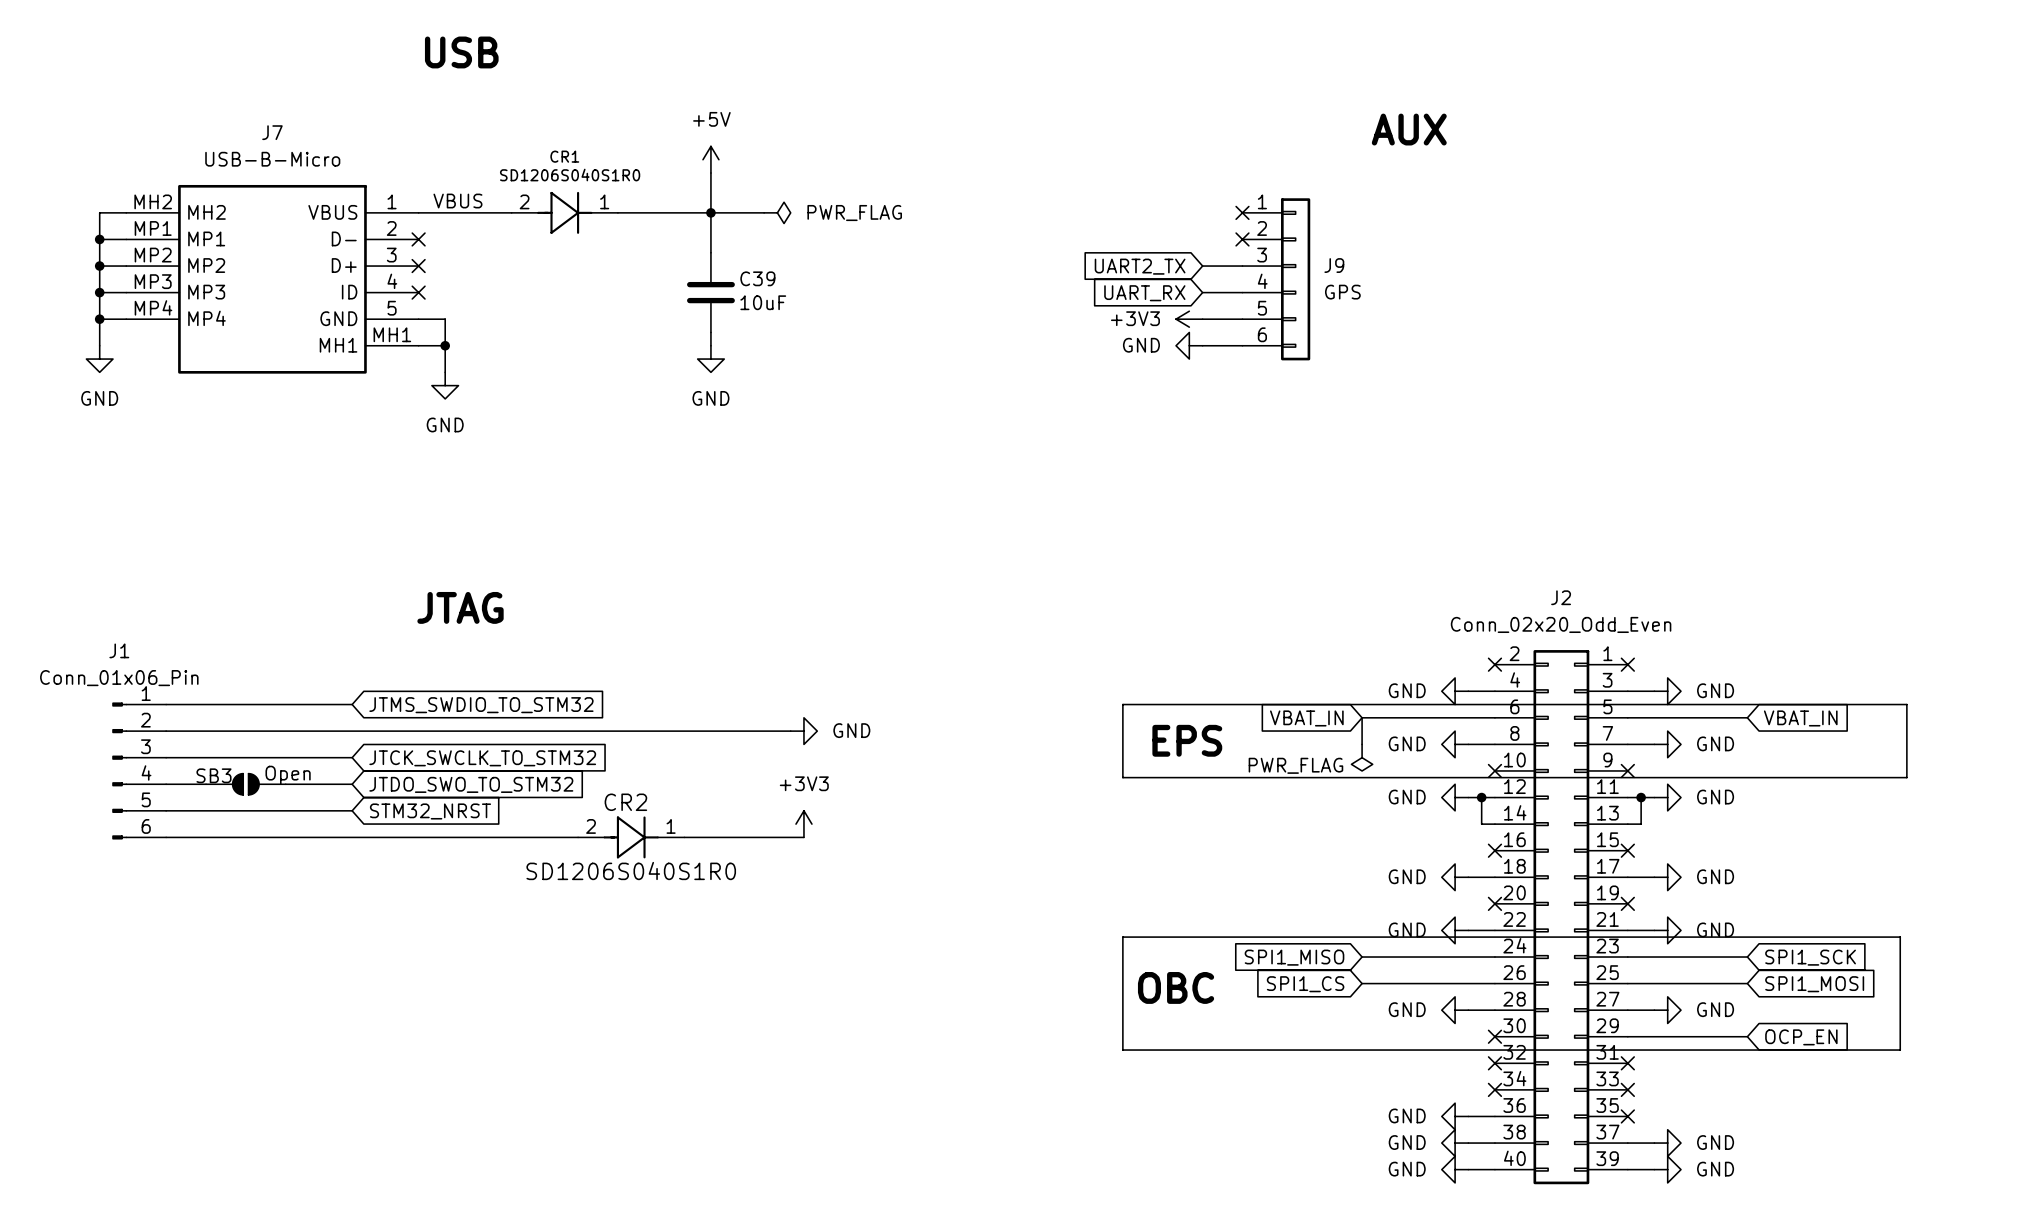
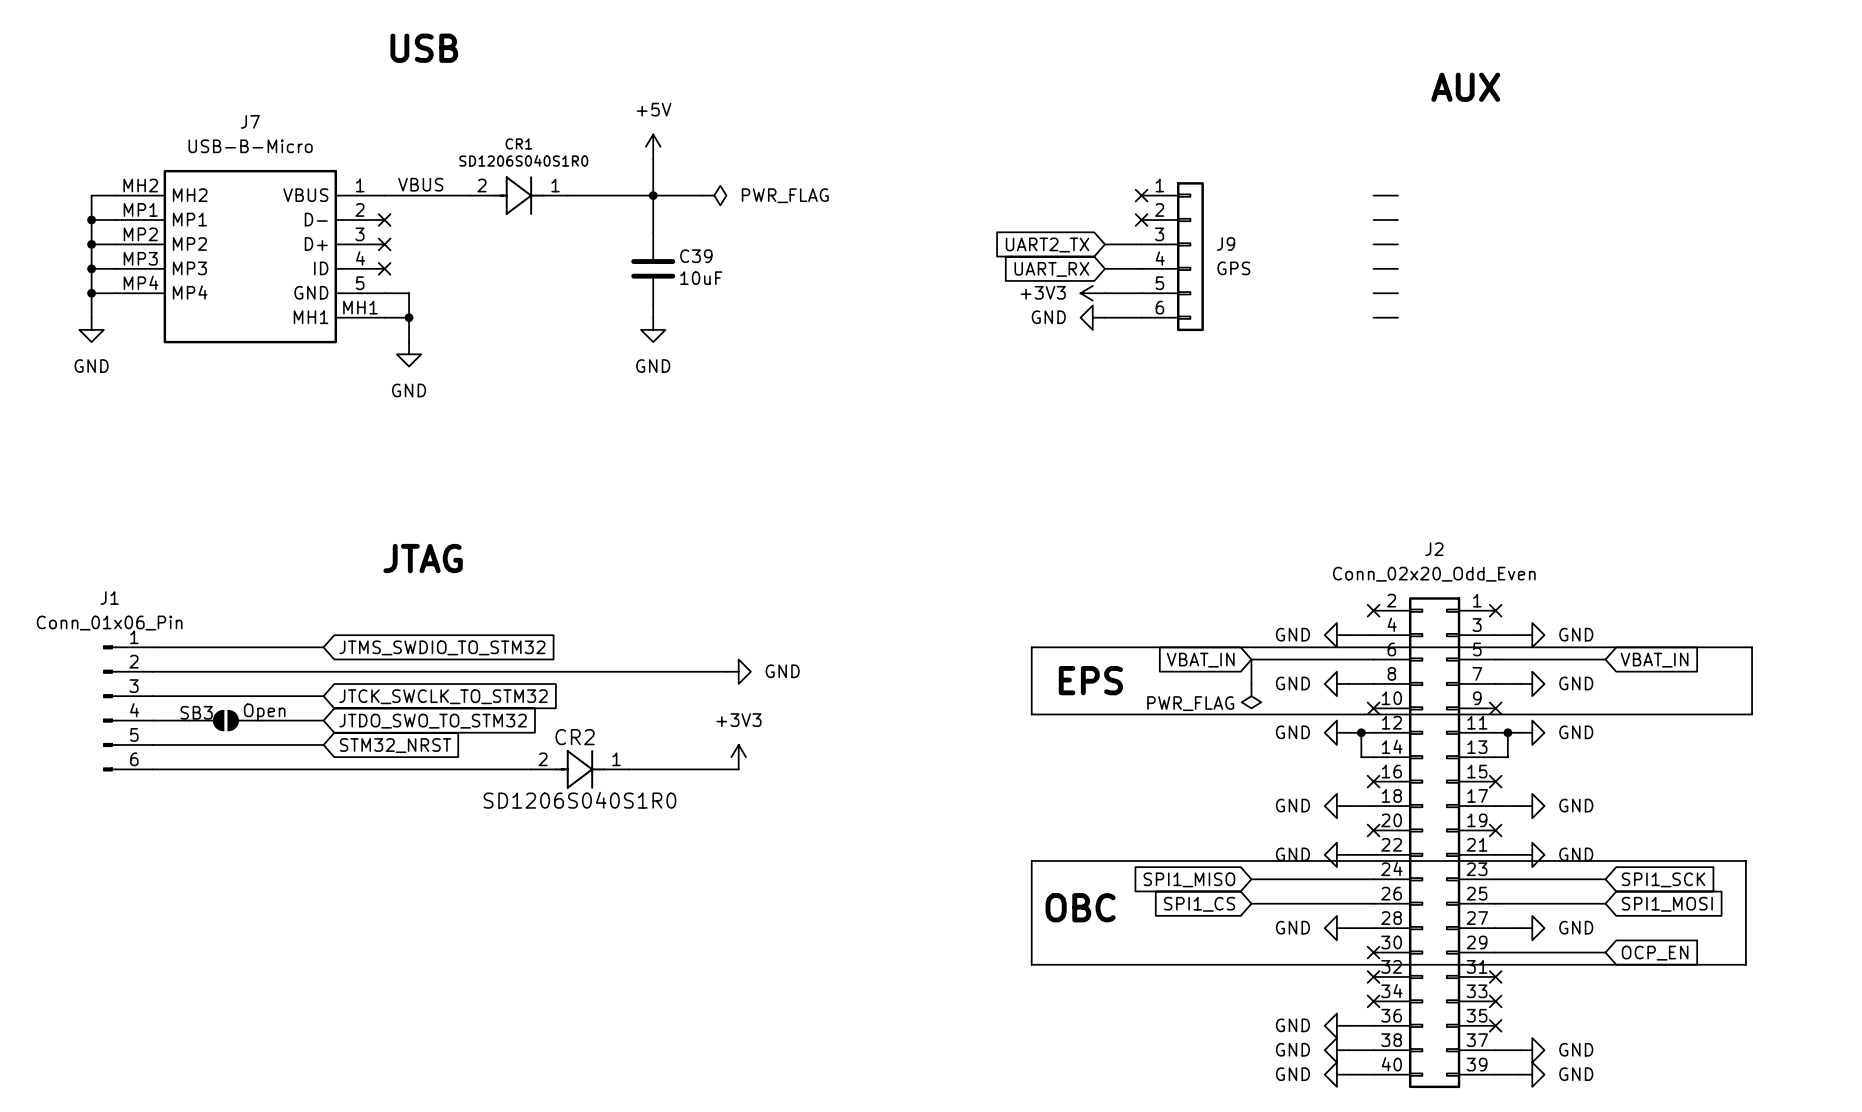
text position: AUX (1409, 129) -> AUX (1465, 87)
wire: none -> (1373, 195) (1397, 195)
wire: none -> (1373, 220) (1397, 220)
wire: none -> (1373, 244) (1397, 244)
wire: none -> (1373, 268) (1397, 268)
wire: none -> (1373, 293) (1397, 293)
wire: none -> (1373, 317) (1397, 317)

